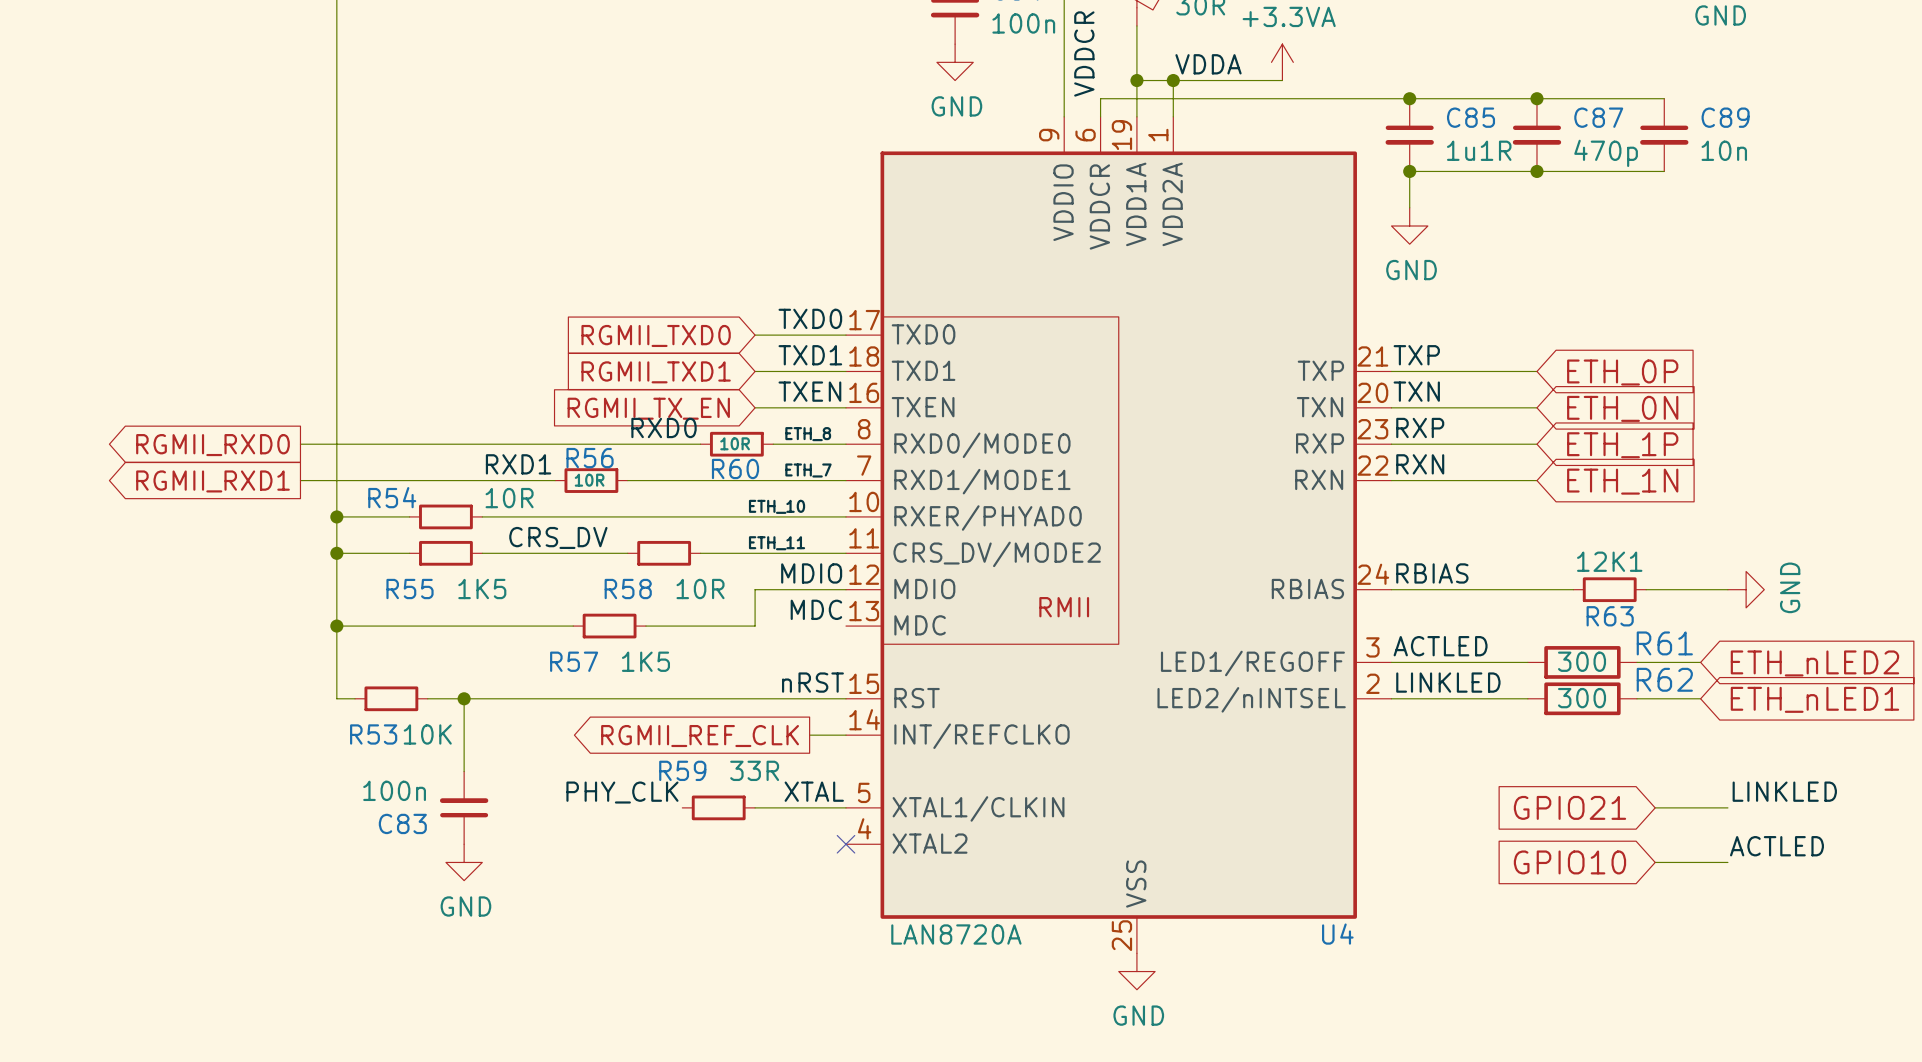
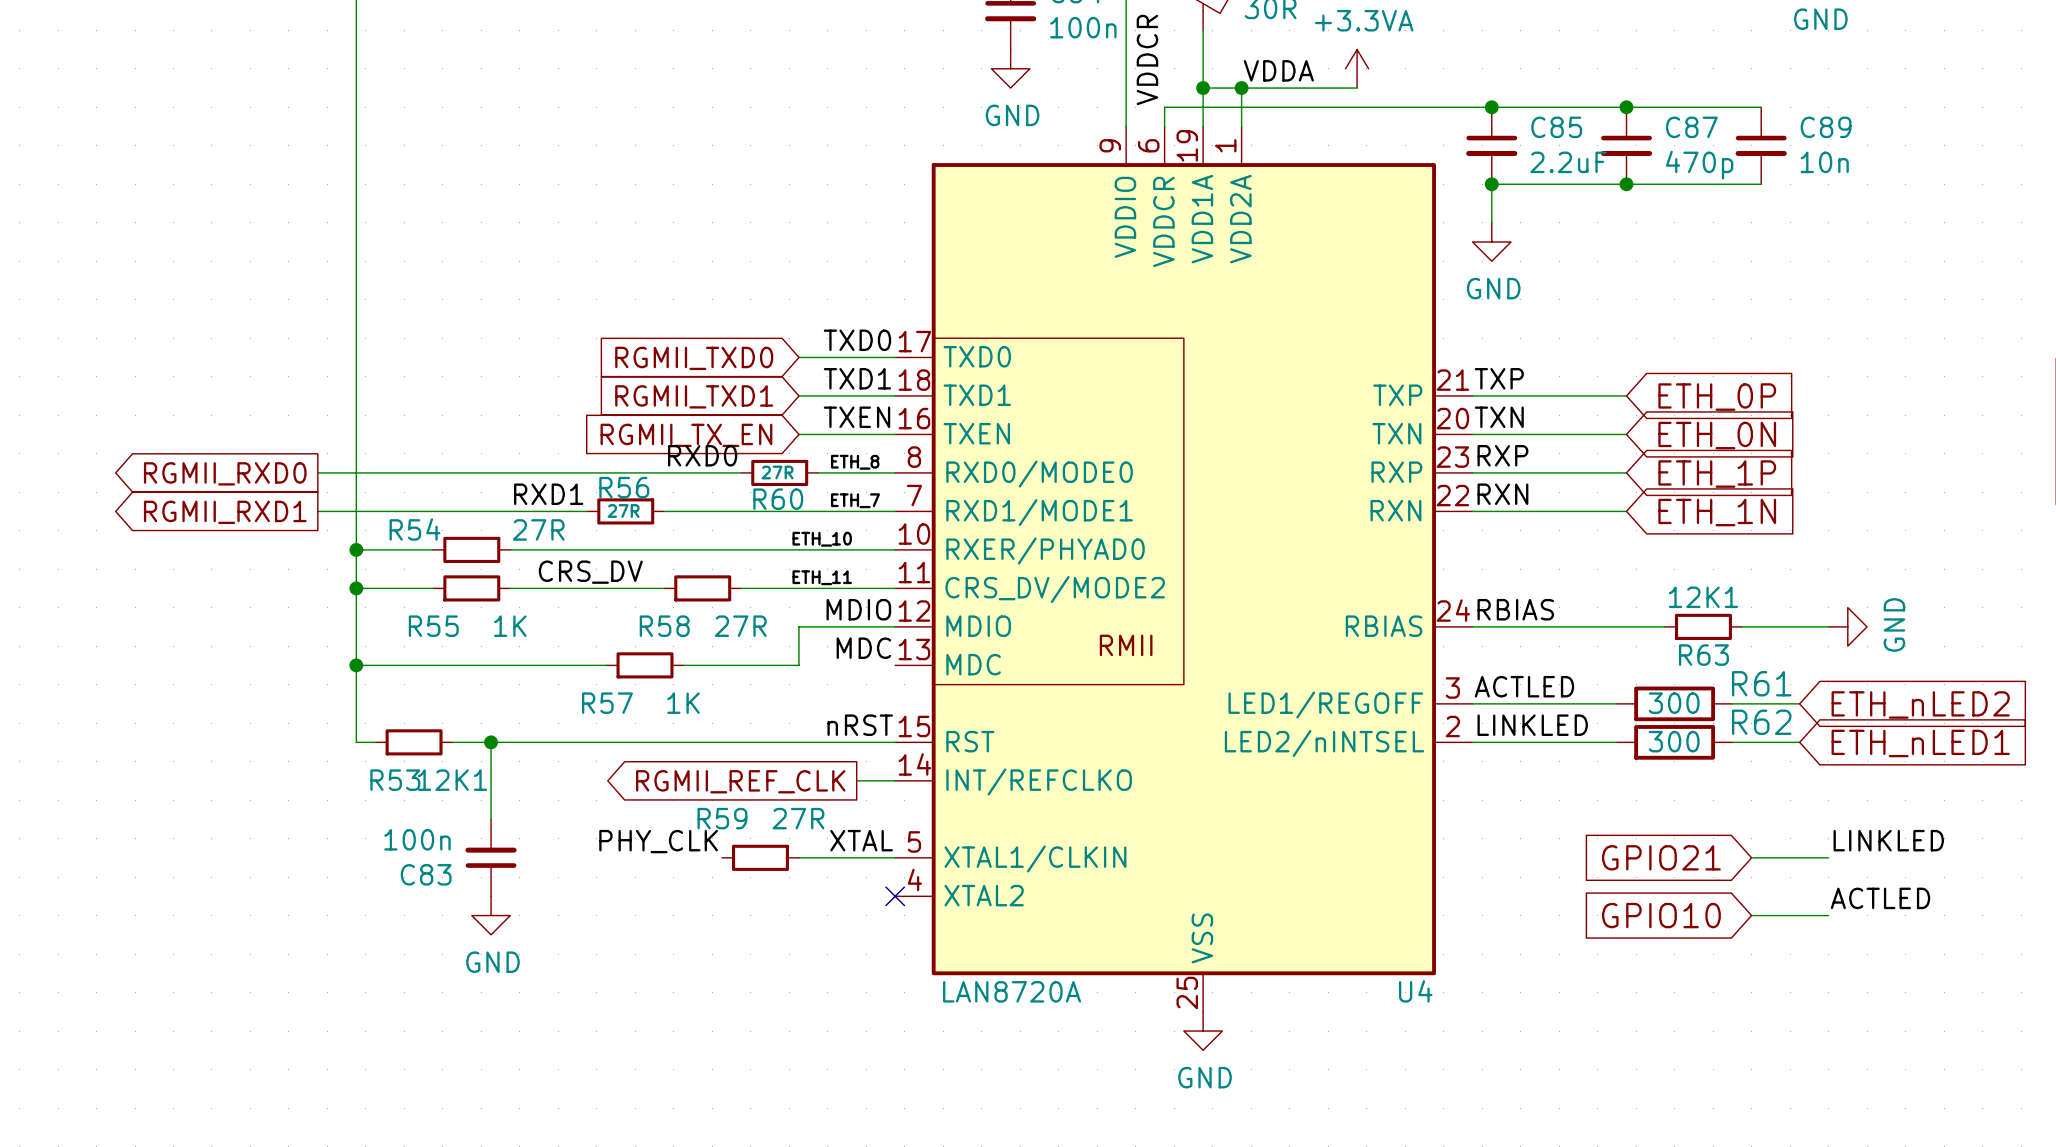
C85 value: 1u1R (1479, 150) -> 2.2uF (1568, 162)
R60 value: 10R (735, 443) -> 27R (777, 472)
R56 value: 10R (589, 480) -> 27R (623, 510)
R54 value: 10R (509, 498) -> 27R (538, 529)
R55 value: 1K5 (482, 589) -> 1K (510, 626)
R58 value: 10R (700, 589) -> 27R (740, 626)
R57 value: 1K5 (645, 661) -> 1K (683, 703)
R53 value: 10K (427, 734) -> 12K1 (452, 780)
R59 value: 33R (754, 770) -> 27R (798, 818)

